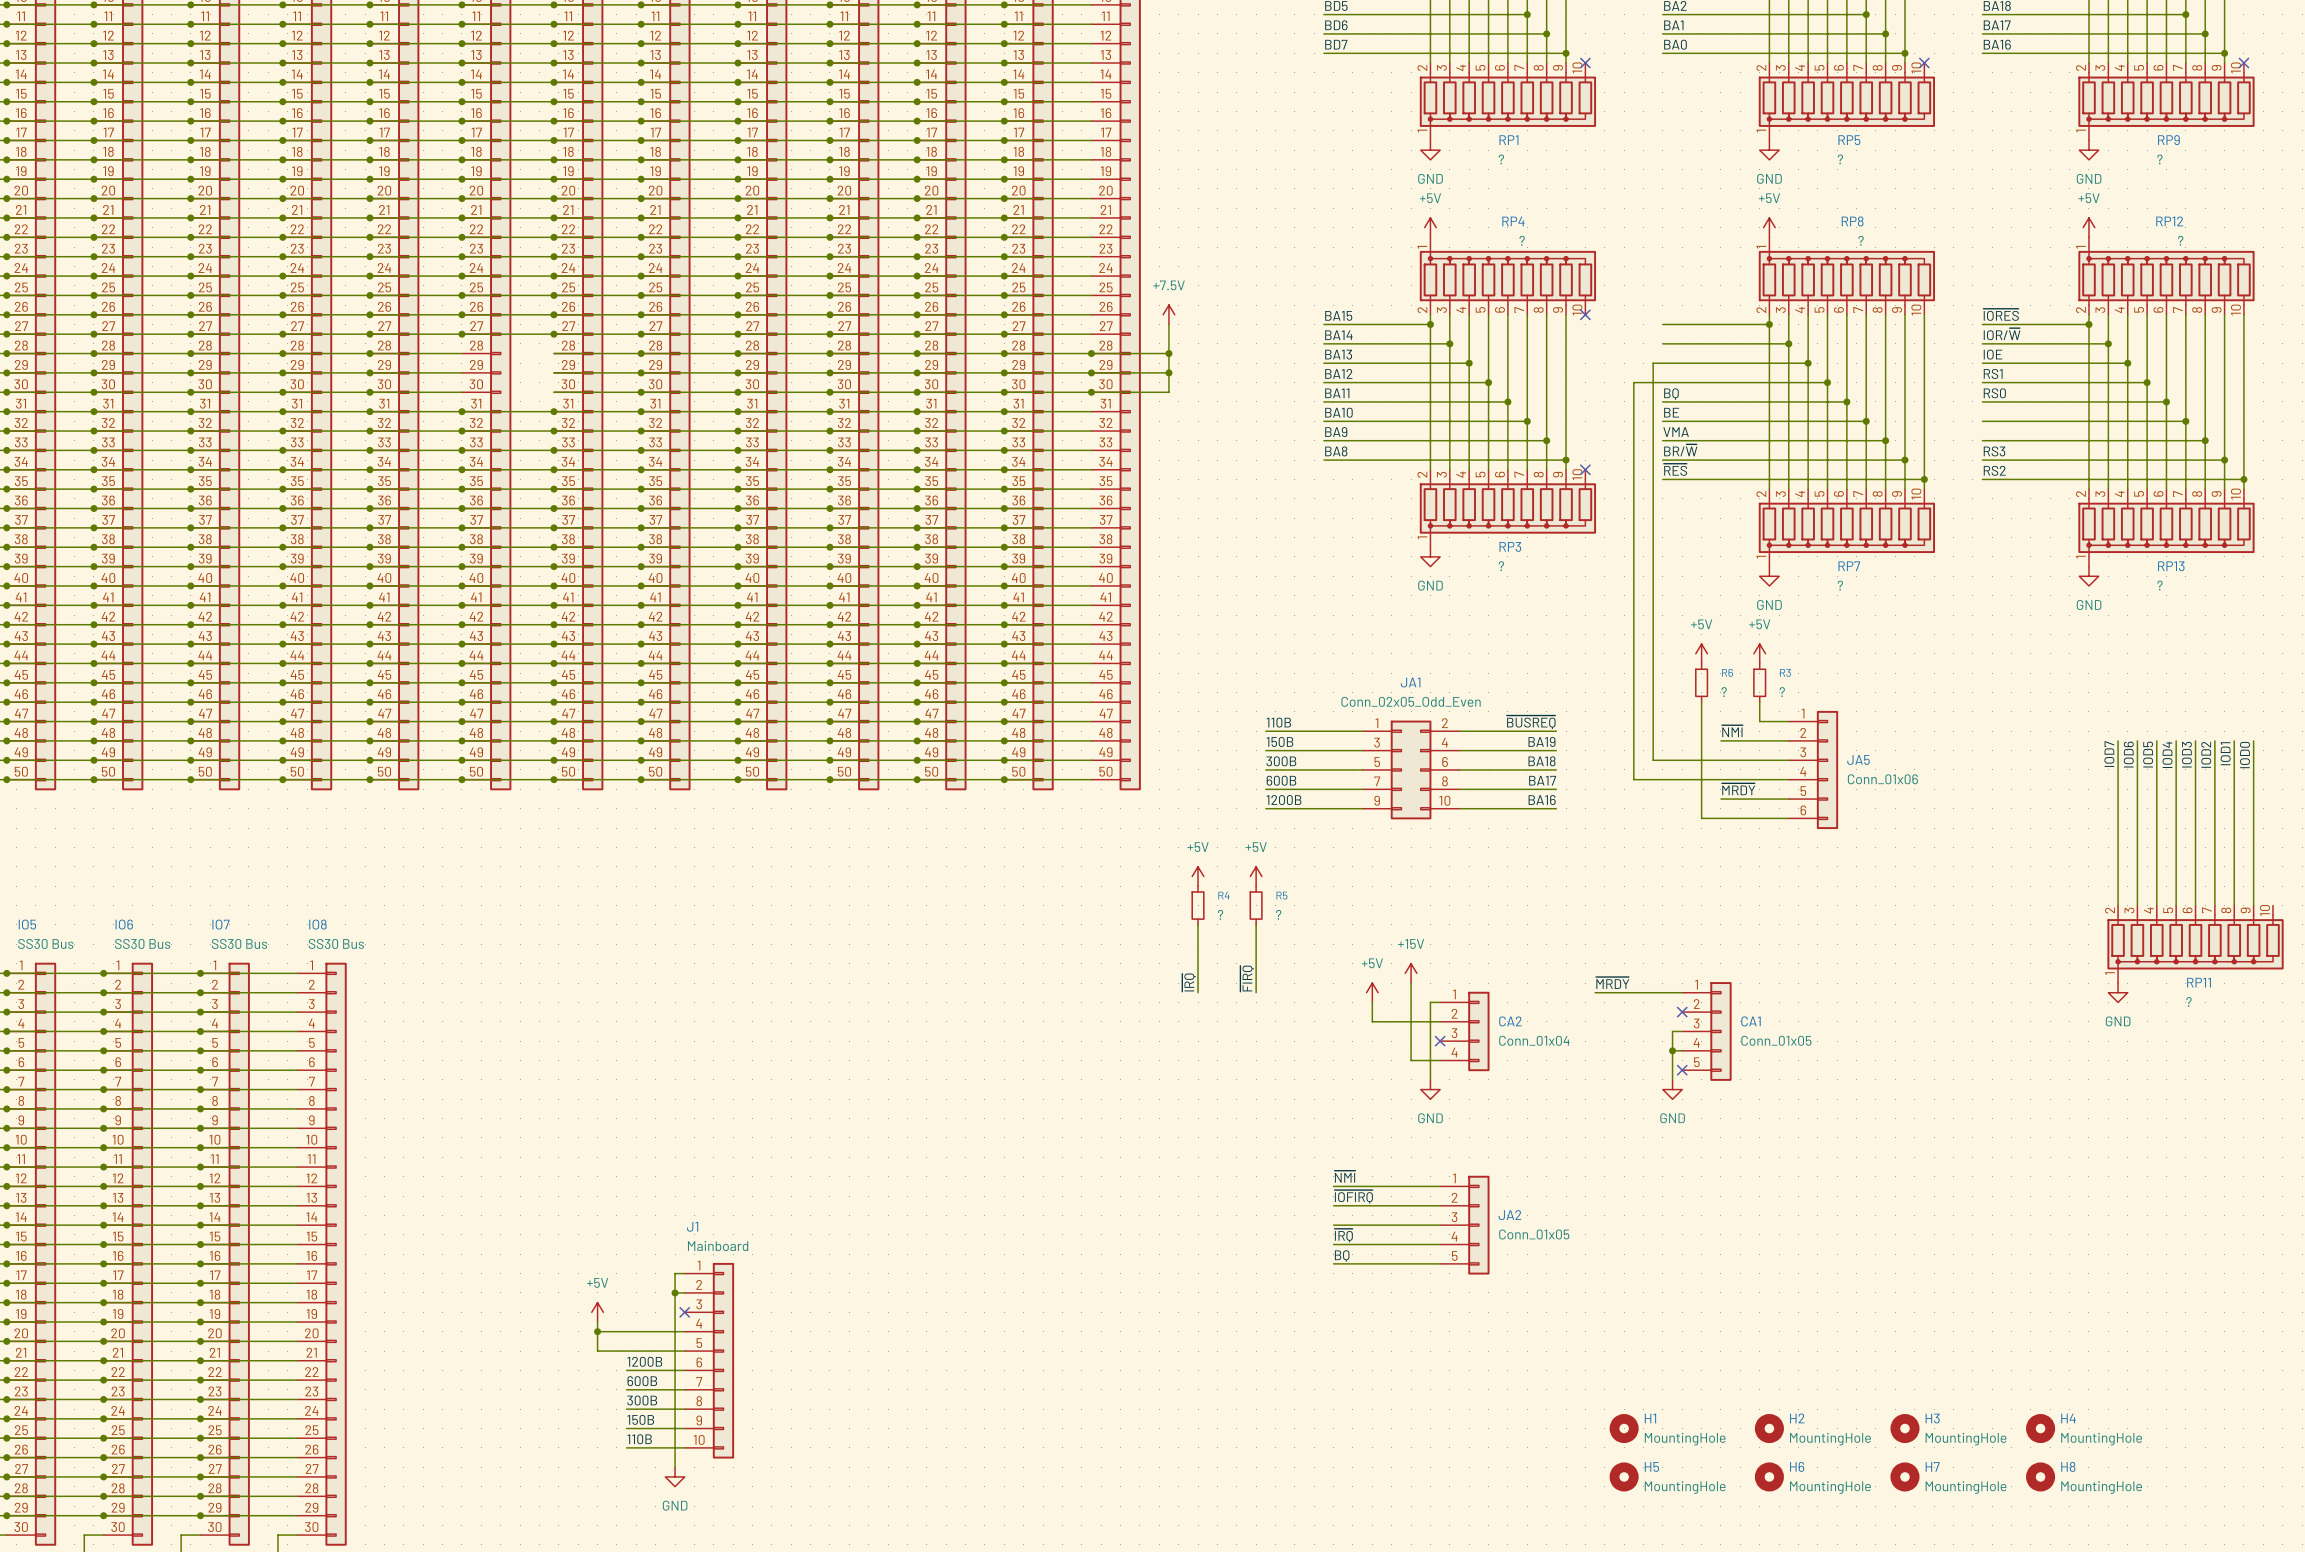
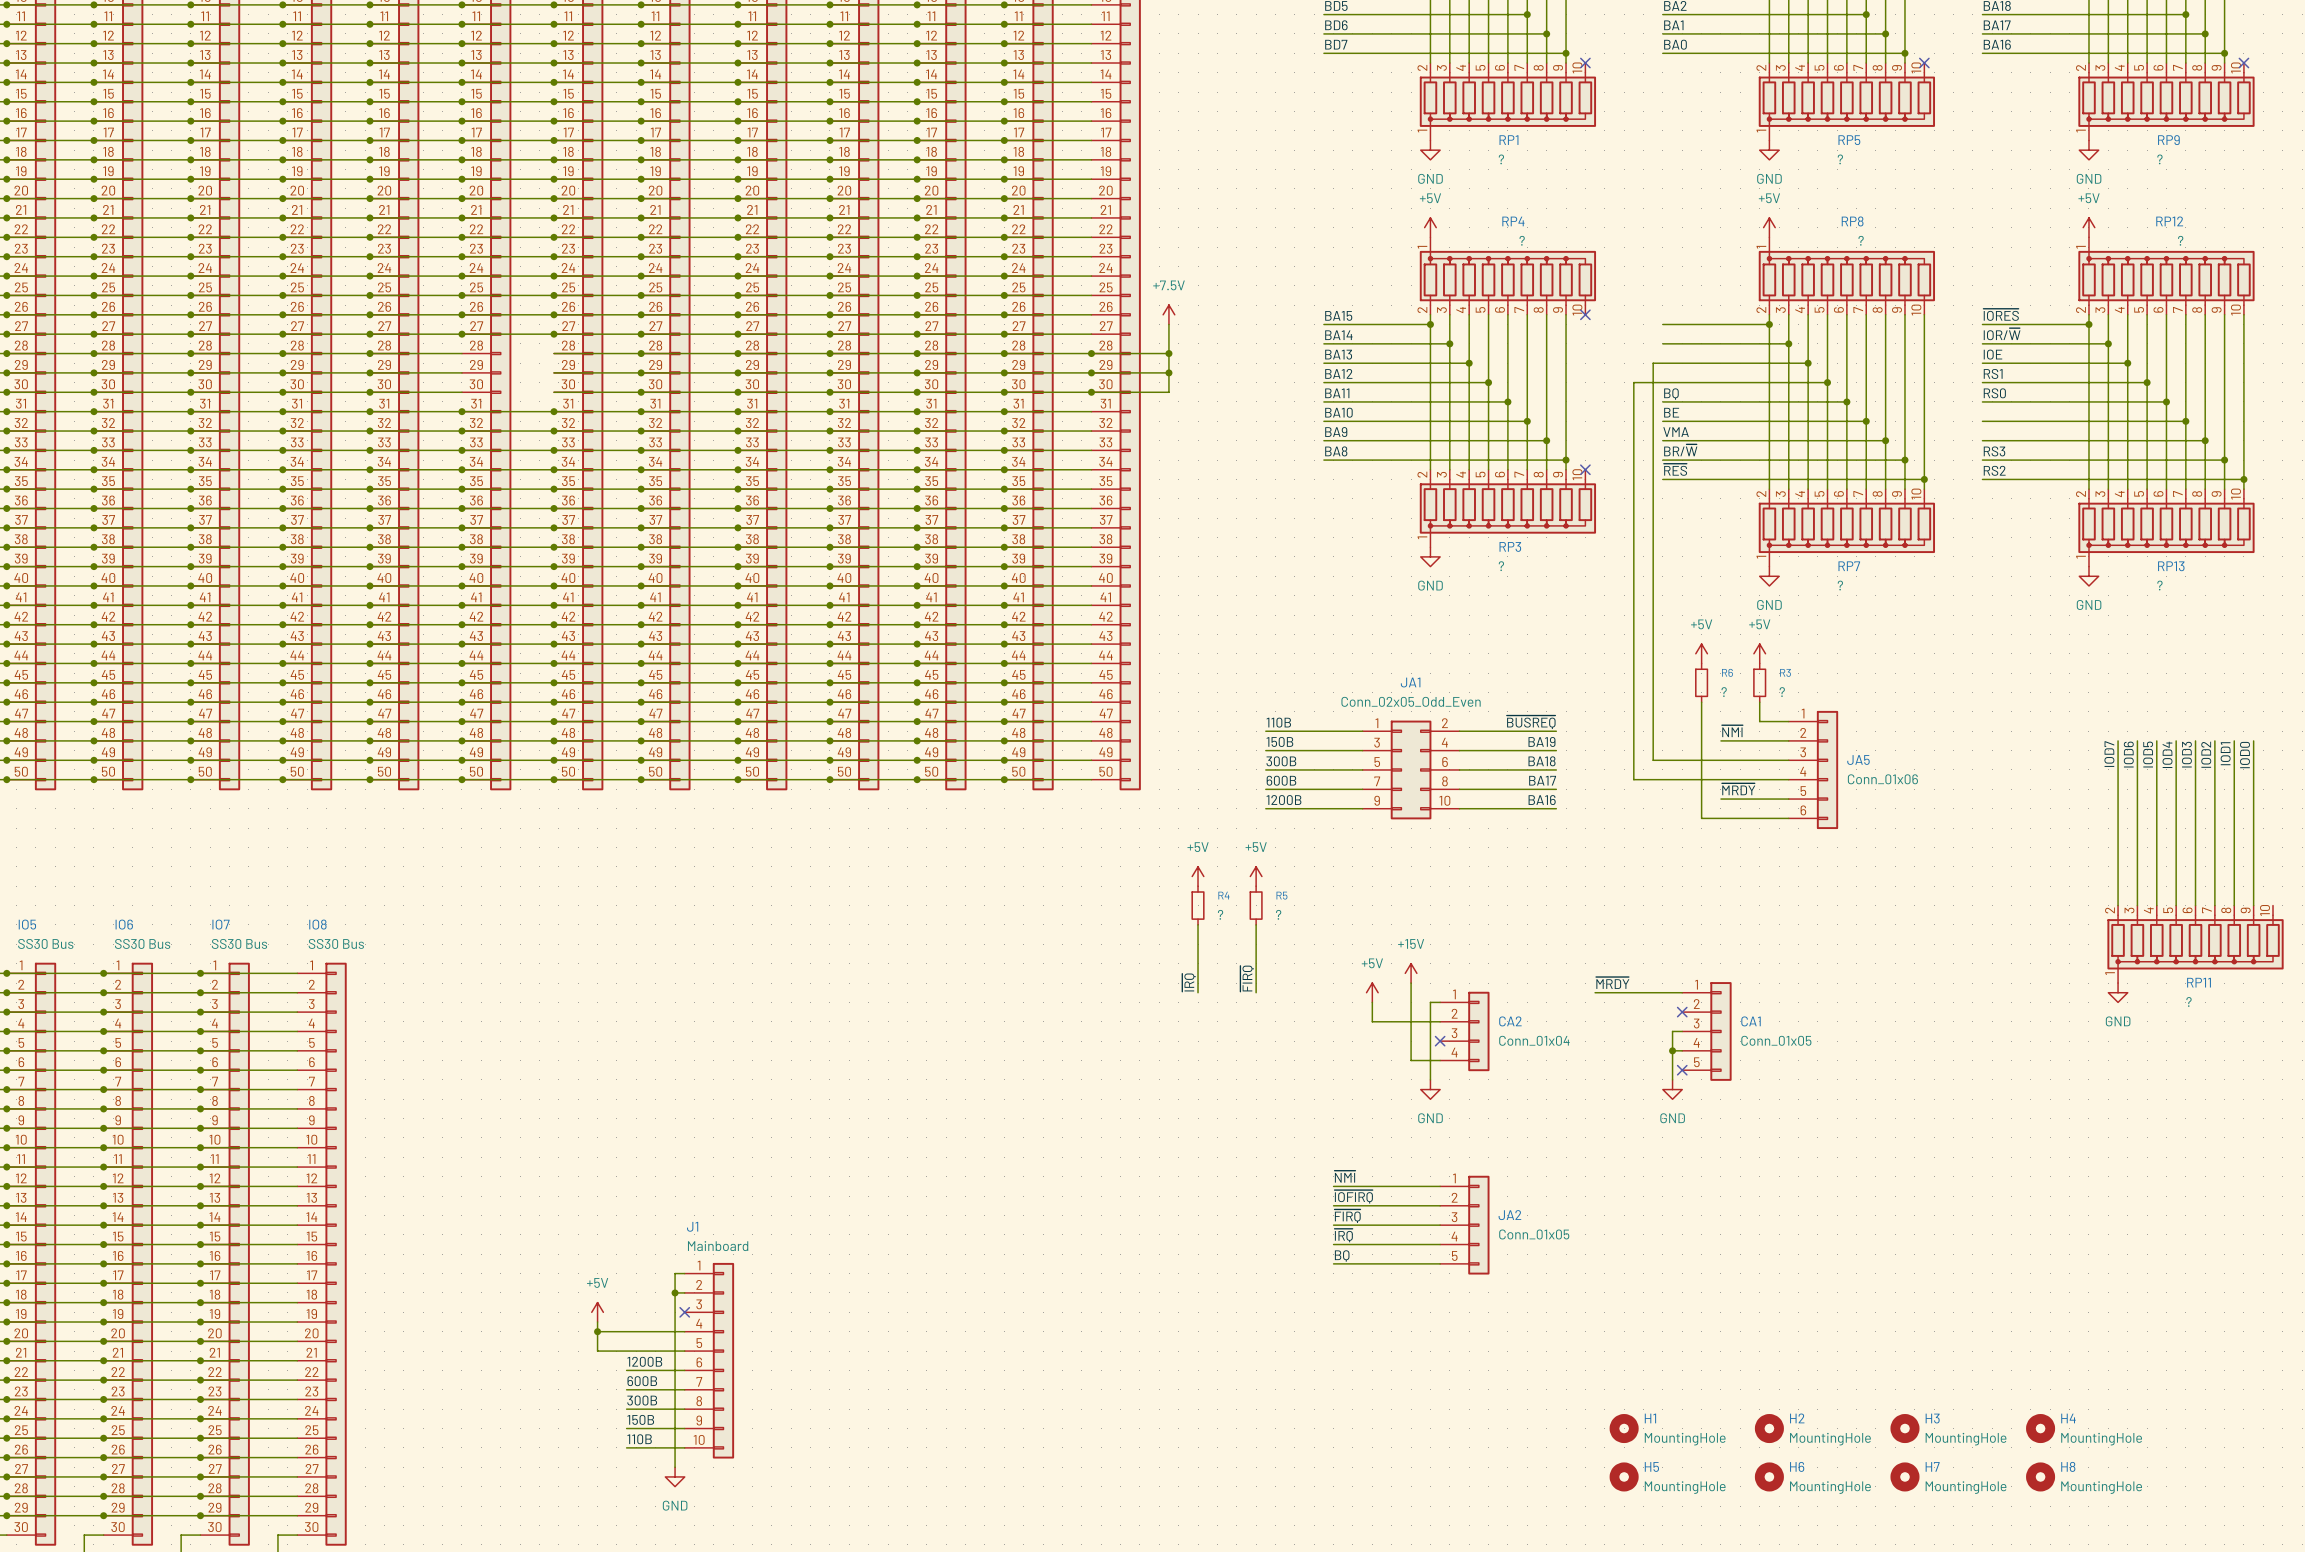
label: none -> ~{FIRQ} (1347, 1216)

